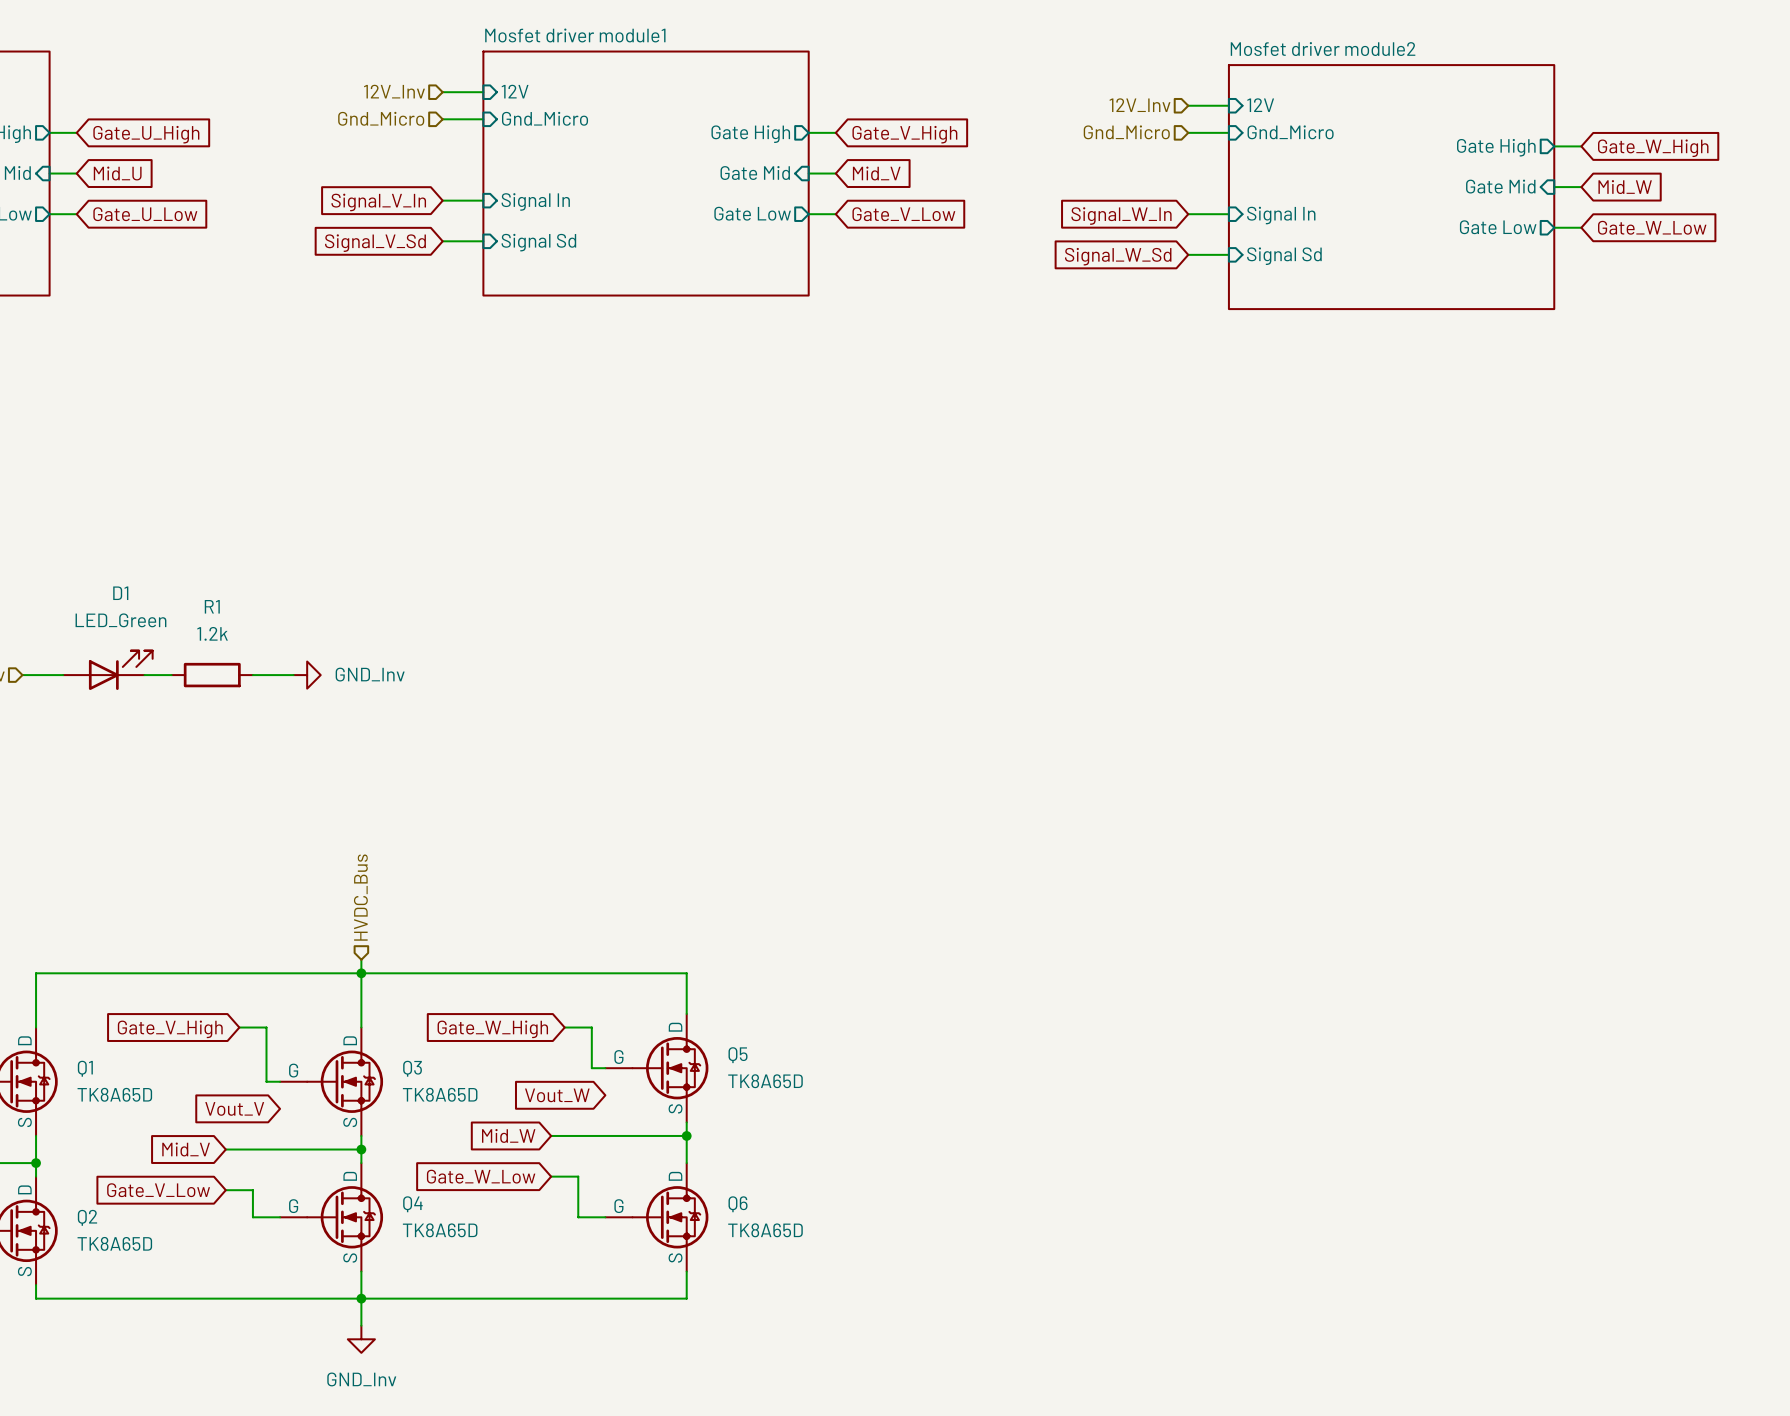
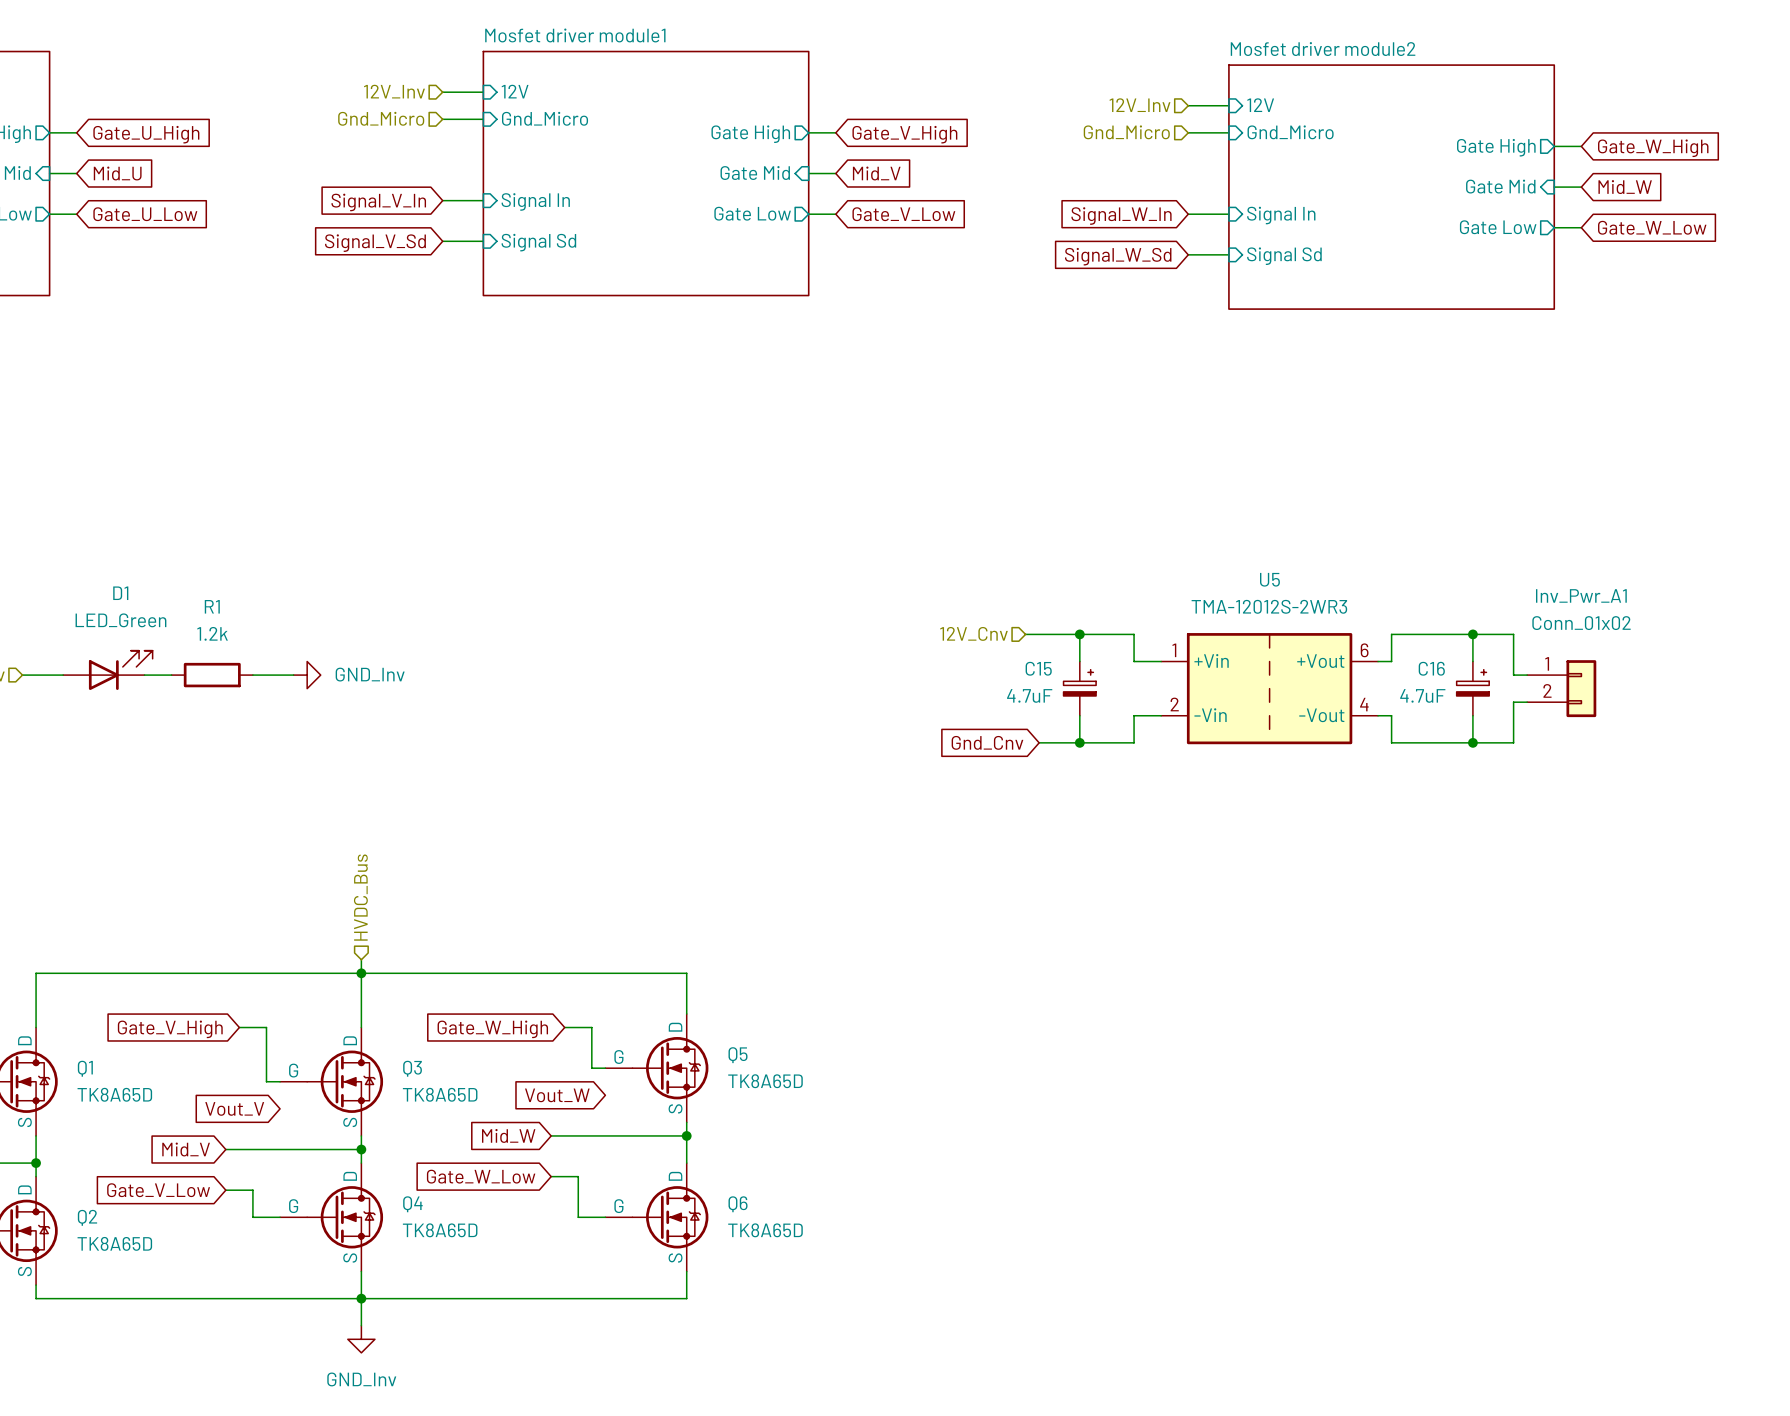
hierarchical label: none -> 12V_Cnv (974, 633)
wire: none -> (1025, 634) (1134, 634) (1134, 661) (1161, 661)
wire: none -> (1079, 634) (1079, 661)
junction: none -> (1079, 634)
wire: none -> (1472, 634) (1472, 661)
junction: none -> (1472, 634)
wire: none -> (1378, 661) (1391, 661) (1391, 634) (1513, 634) (1513, 675) (1527, 675)
C15: none -> 4.7uF (1079, 688)
U5: none -> TMA-12012S-2WR3 (1269, 688)
C16: none -> 4.7uF (1472, 688)
Inv_Pwr_A1: none -> Conn_01x02 (1561, 688)
wire: none -> (1527, 702) (1513, 702) (1513, 742) (1391, 742) (1391, 715) (1378, 715)
wire: none -> (1079, 715) (1079, 742)
wire: none -> (1161, 715) (1134, 715) (1134, 742) (1039, 742)
wire: none -> (1472, 715) (1472, 742)
global label: none -> Gnd_Cnv (987, 742)
junction: none -> (1079, 742)
junction: none -> (1472, 742)

